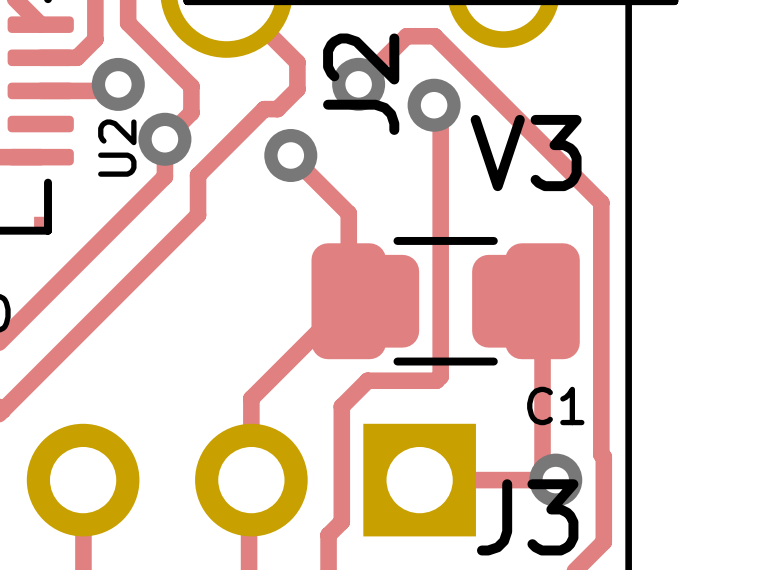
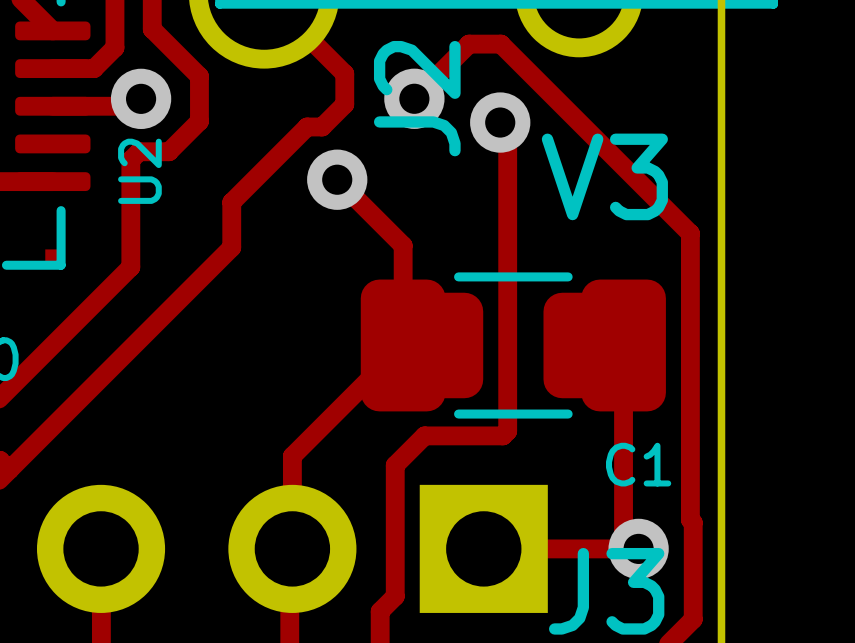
track: (169, 64) (191, 86) (191, 112) (164, 139) (164, 176) (109, 232) -> (199, 76) (199, 121) (169, 151) (139, 151) (130, 160) (130, 267)
via: (164, 139) -> none

